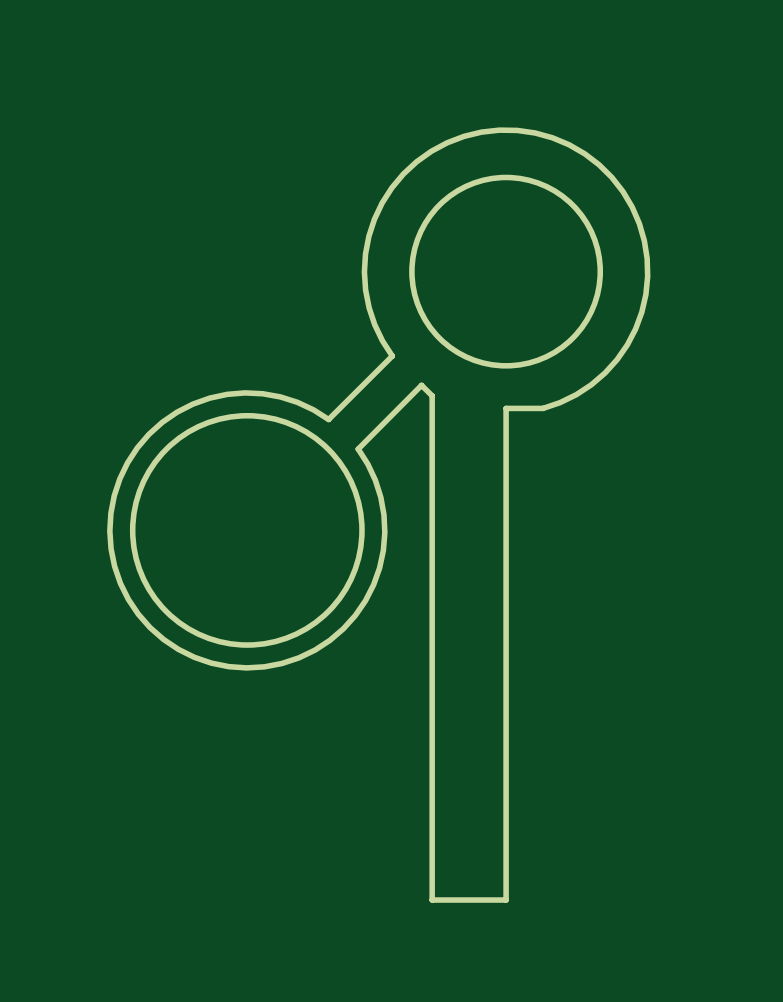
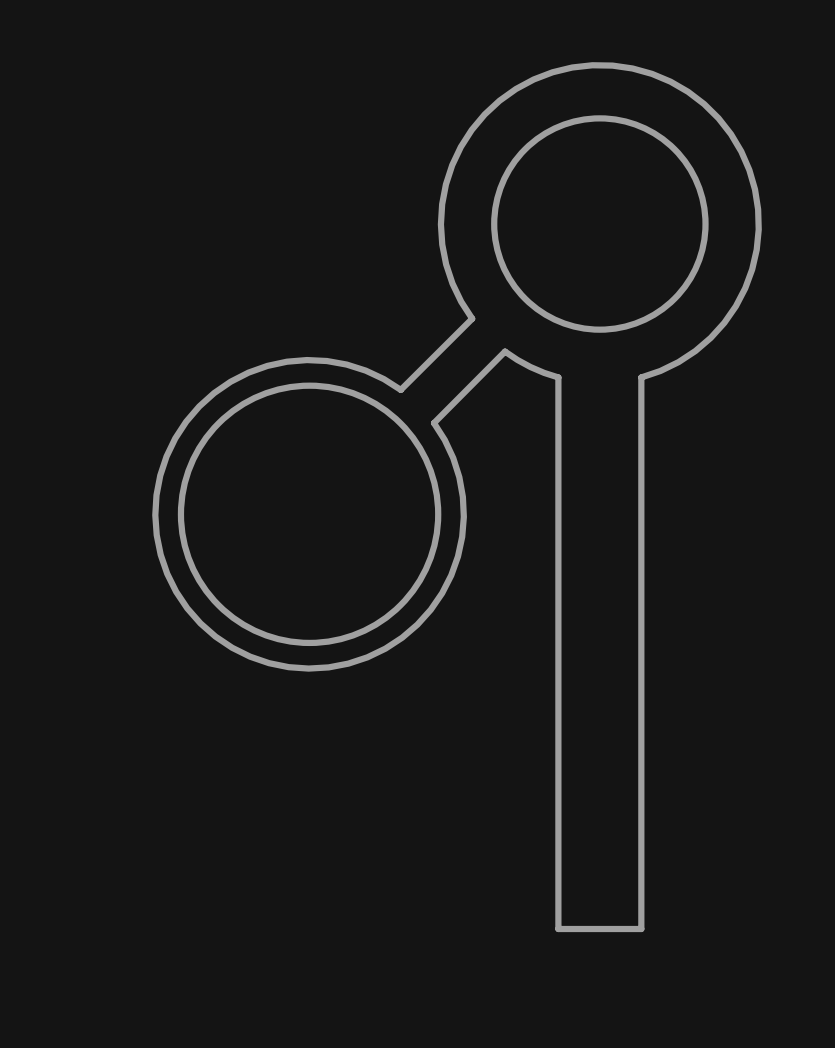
board edge: (421, 385) (432, 395) (432, 900) (469, 900) -> (505, 351) (530, 367) (558, 377) (558, 929)
board edge: (543, 408) (506, 408) (506, 900) -> (641, 377) (641, 929) (599, 929)

